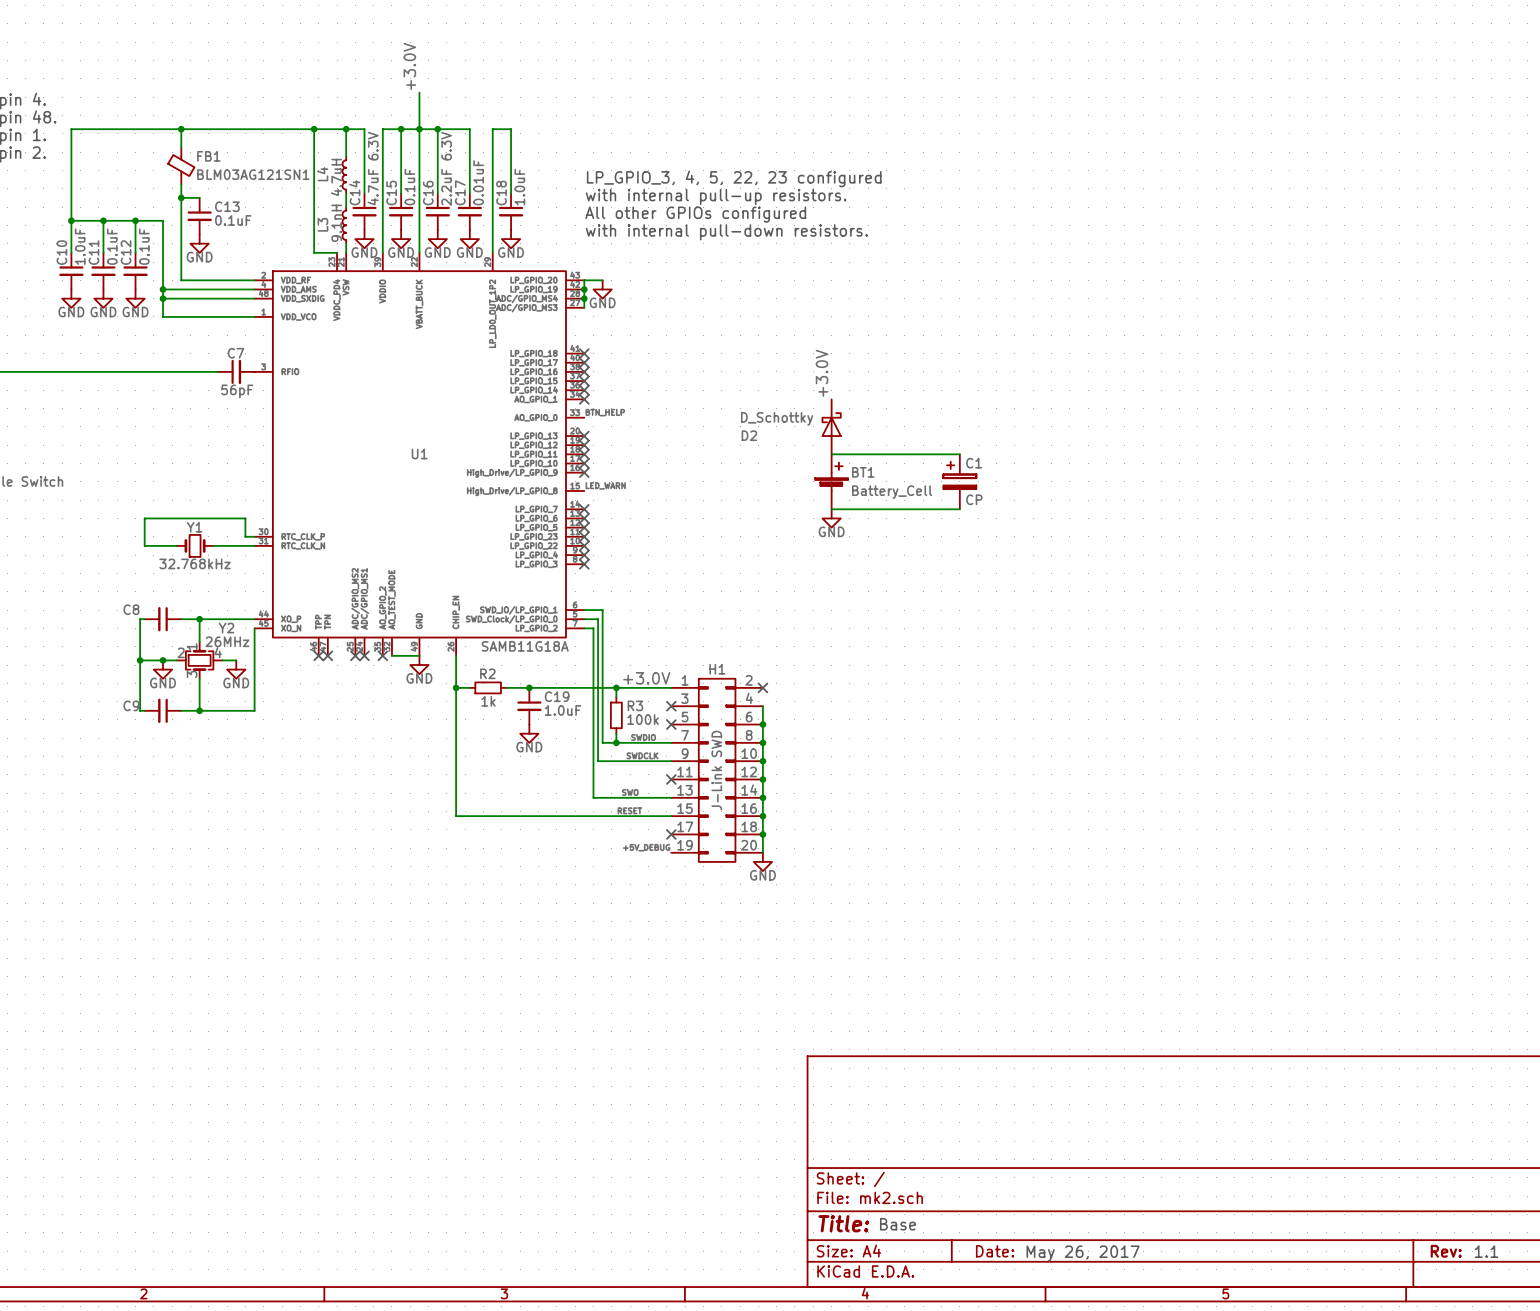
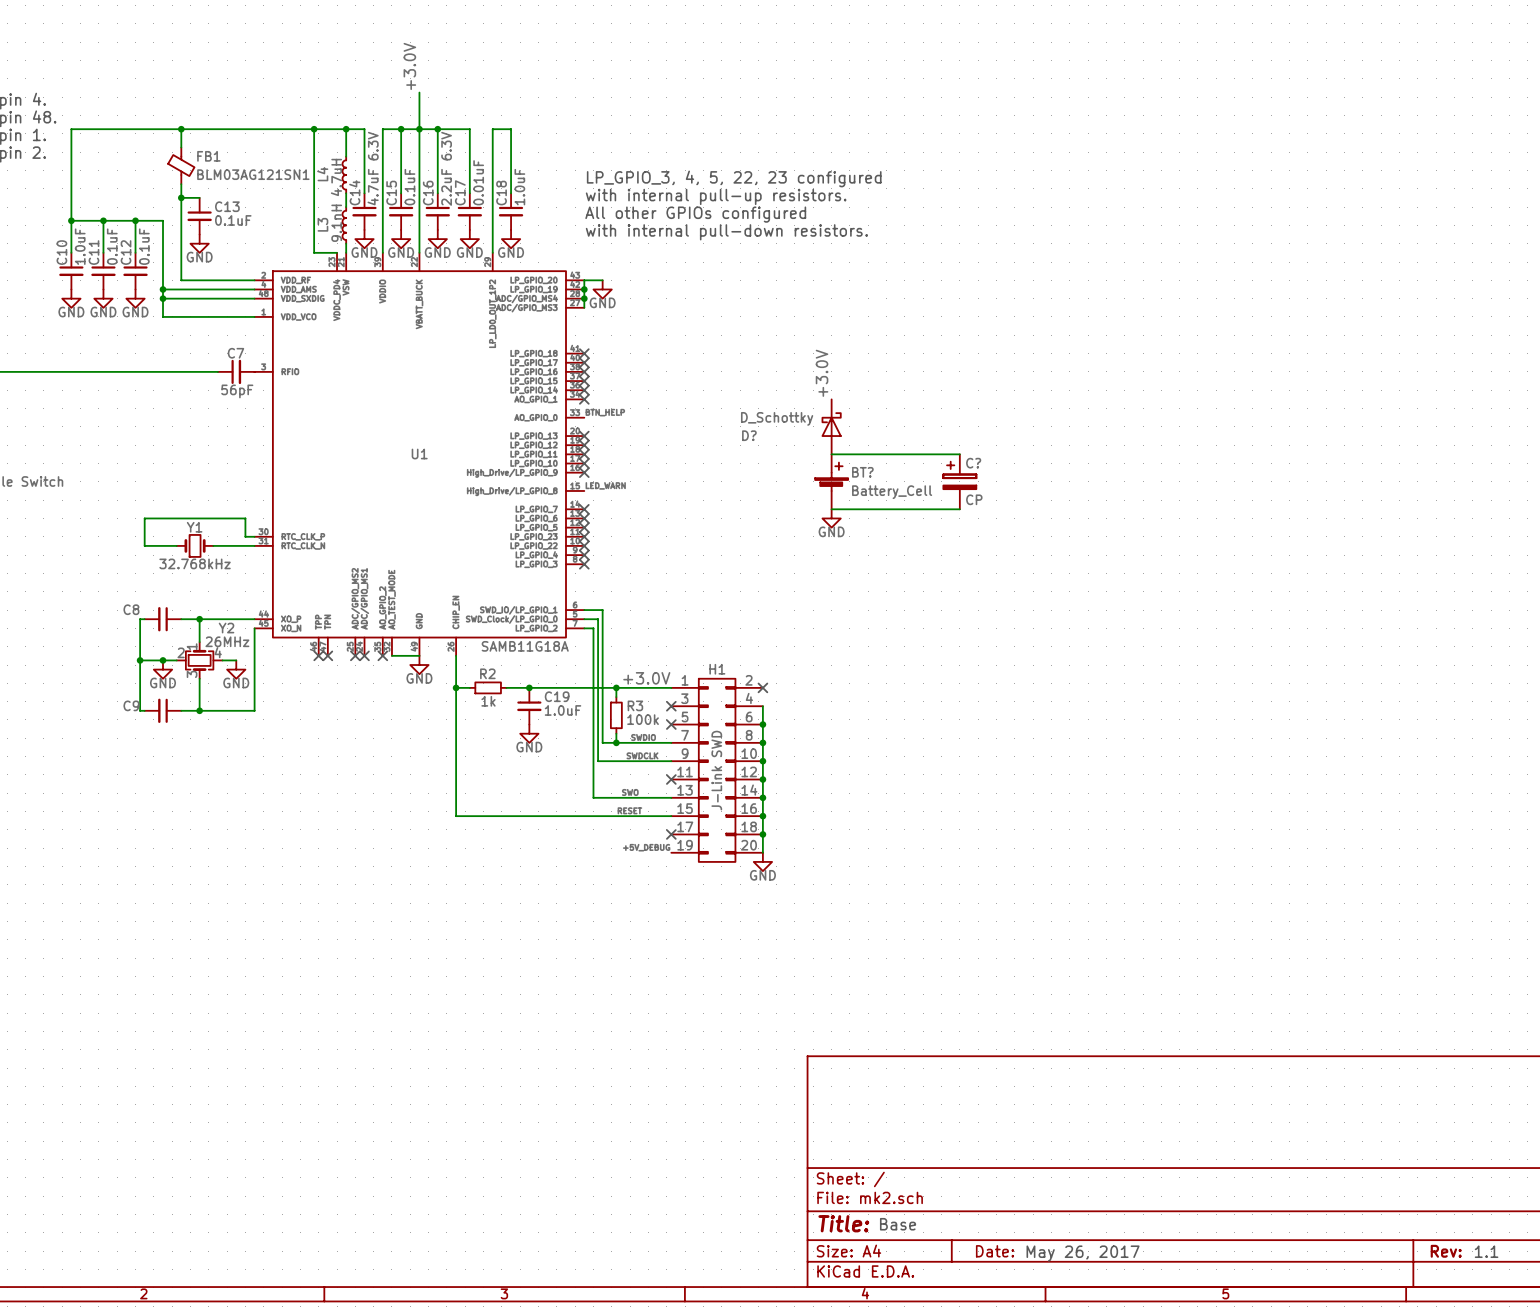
D2 name: D2 (749, 435) -> D? (749, 435)
C1 name: C1 (974, 463) -> C? (973, 463)
BT1 name: BT1 (863, 472) -> BT? (862, 472)

